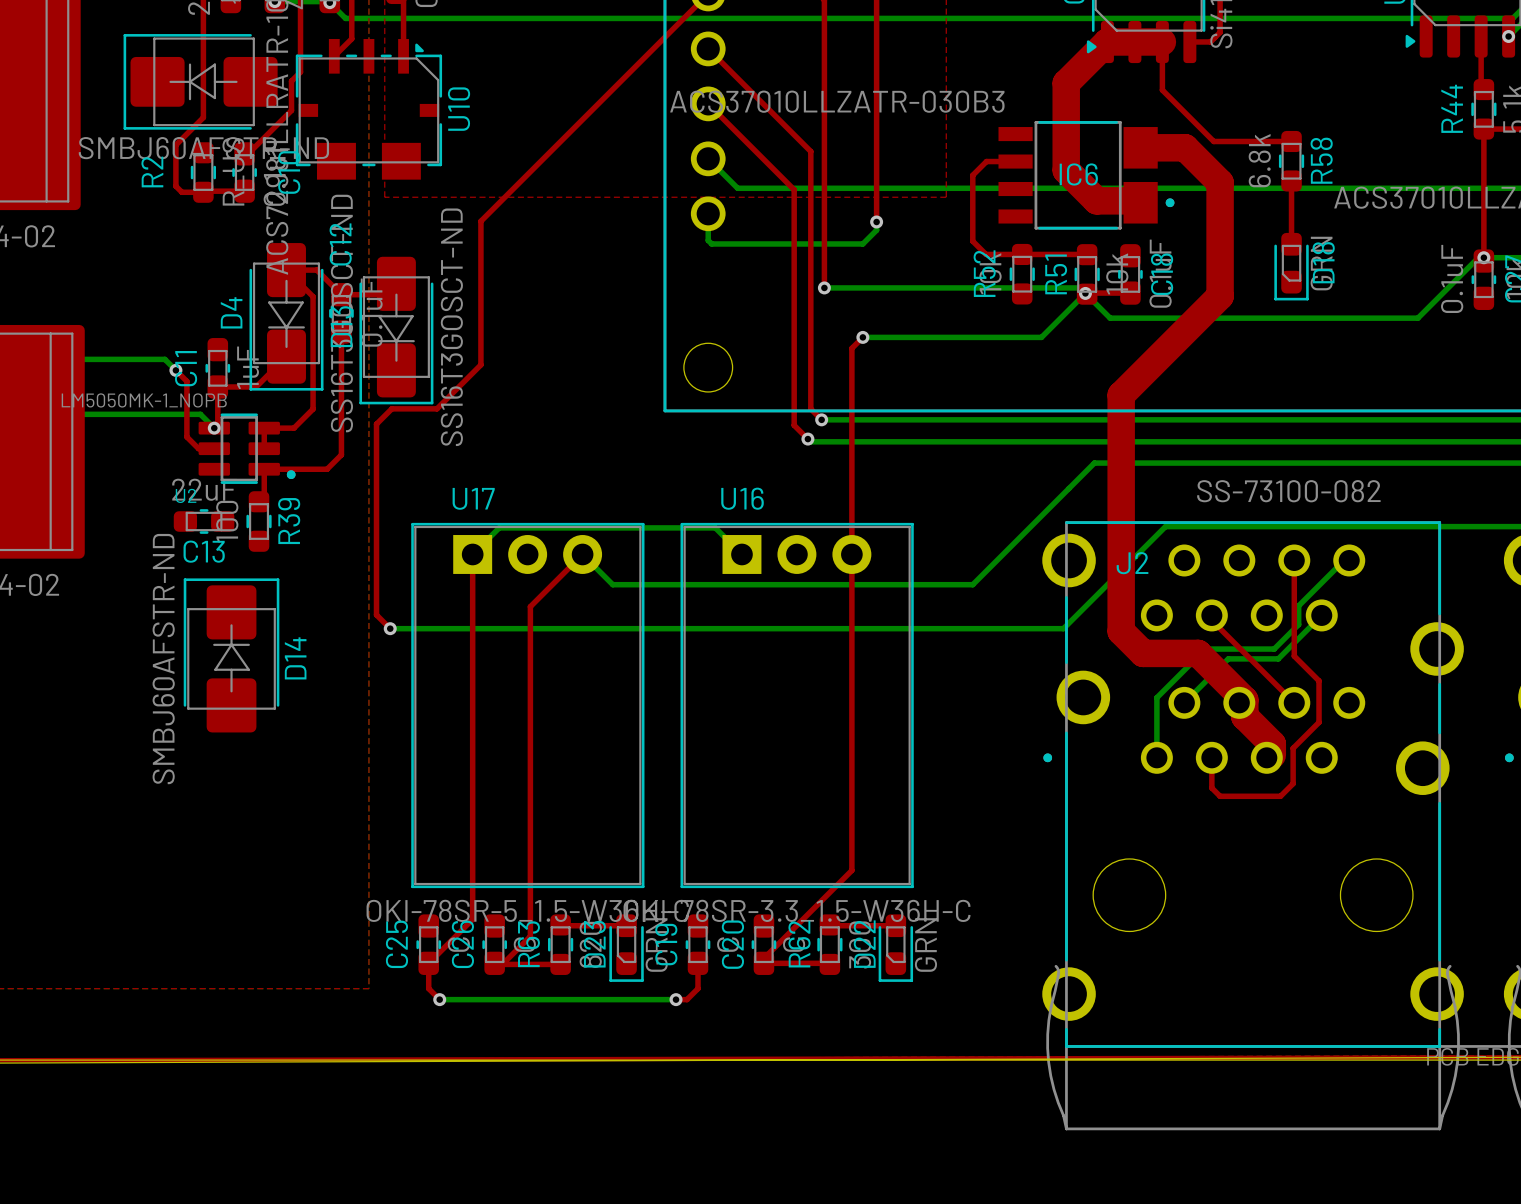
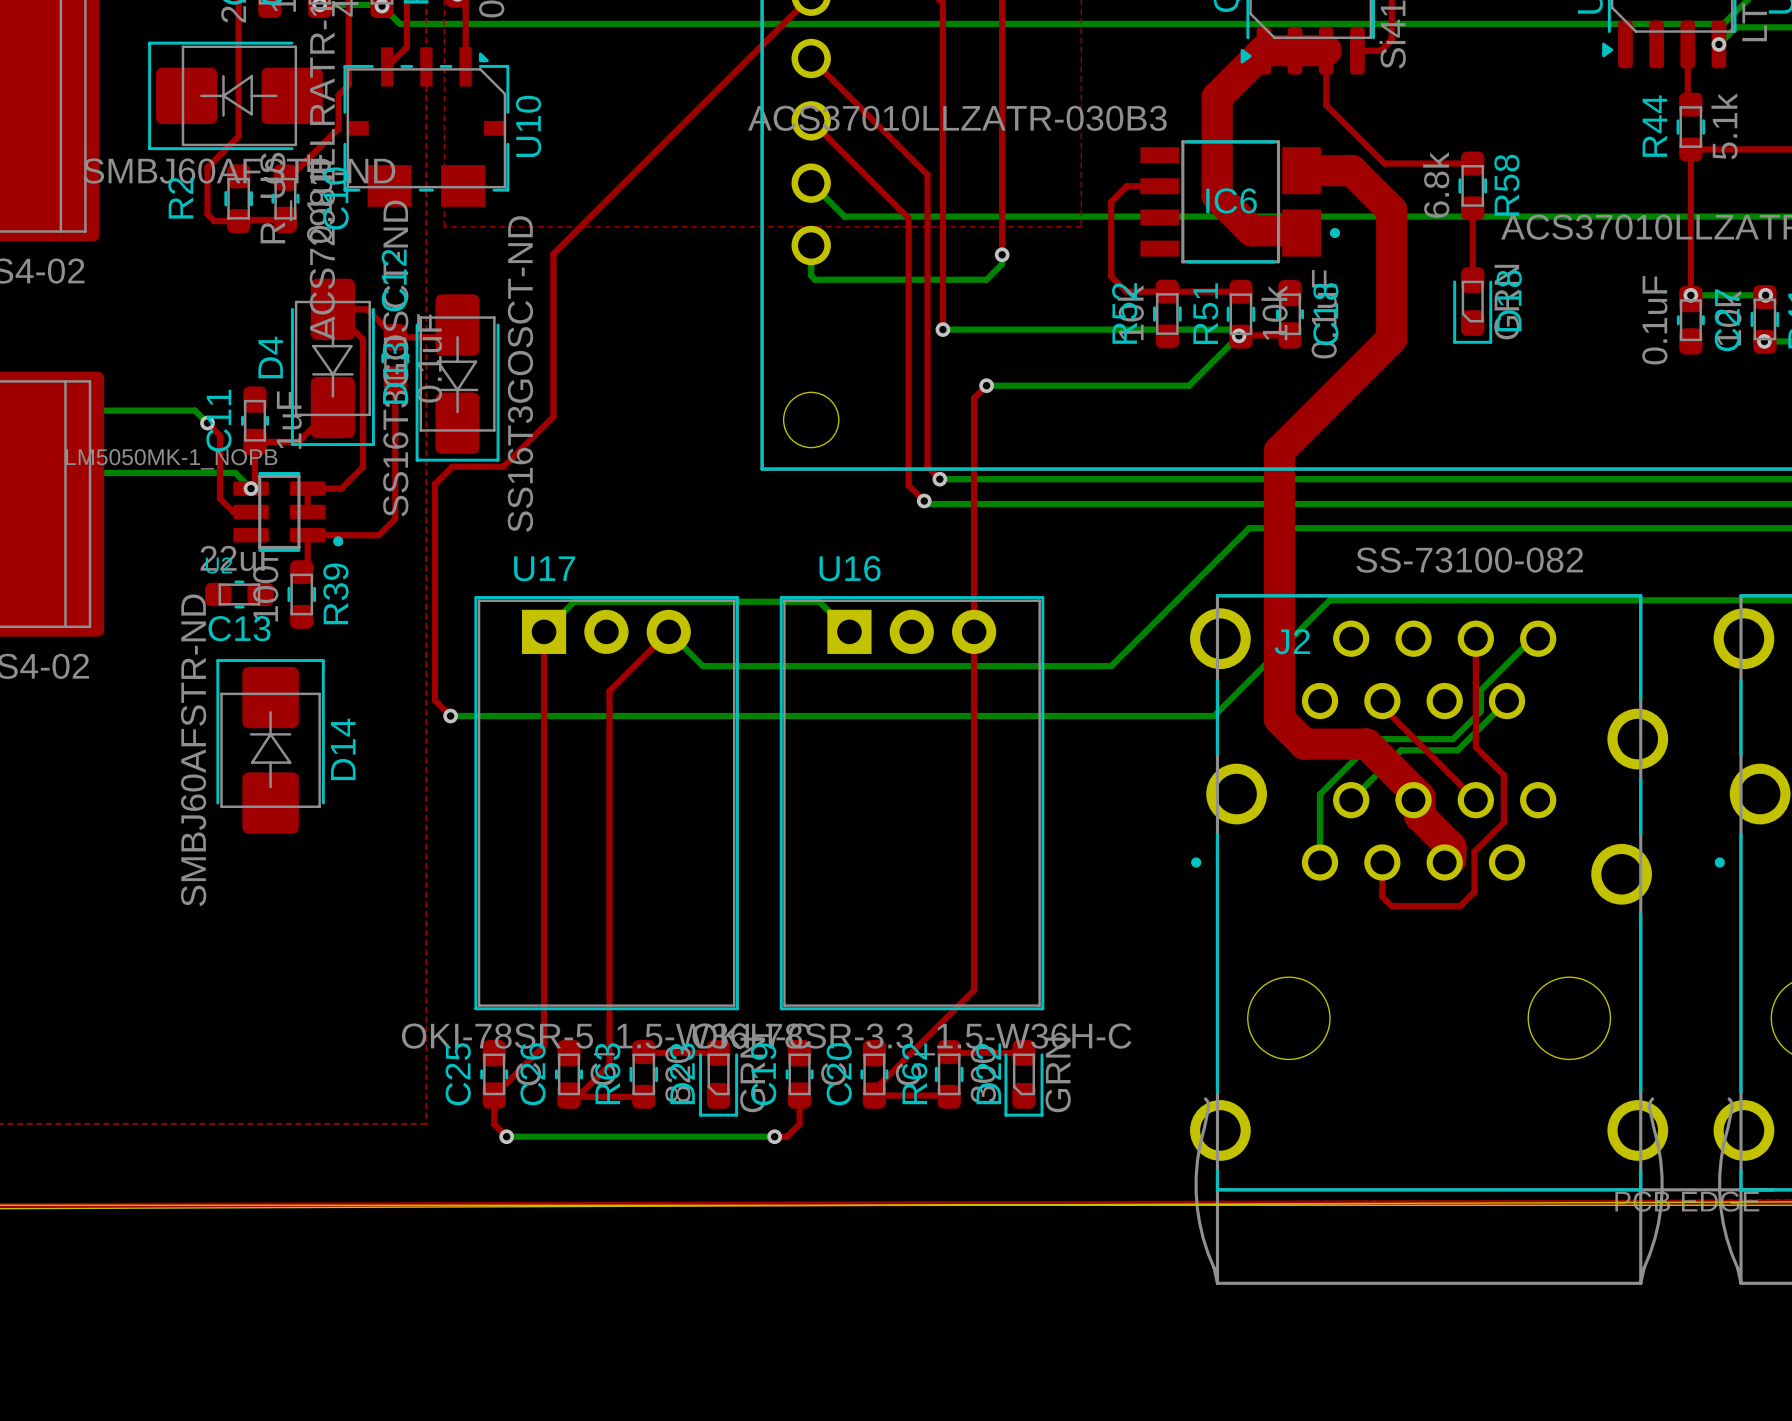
bottom track: (1483, 257) (1478, 257) (1417, 318) (1110, 318) (1085, 293) -> none

